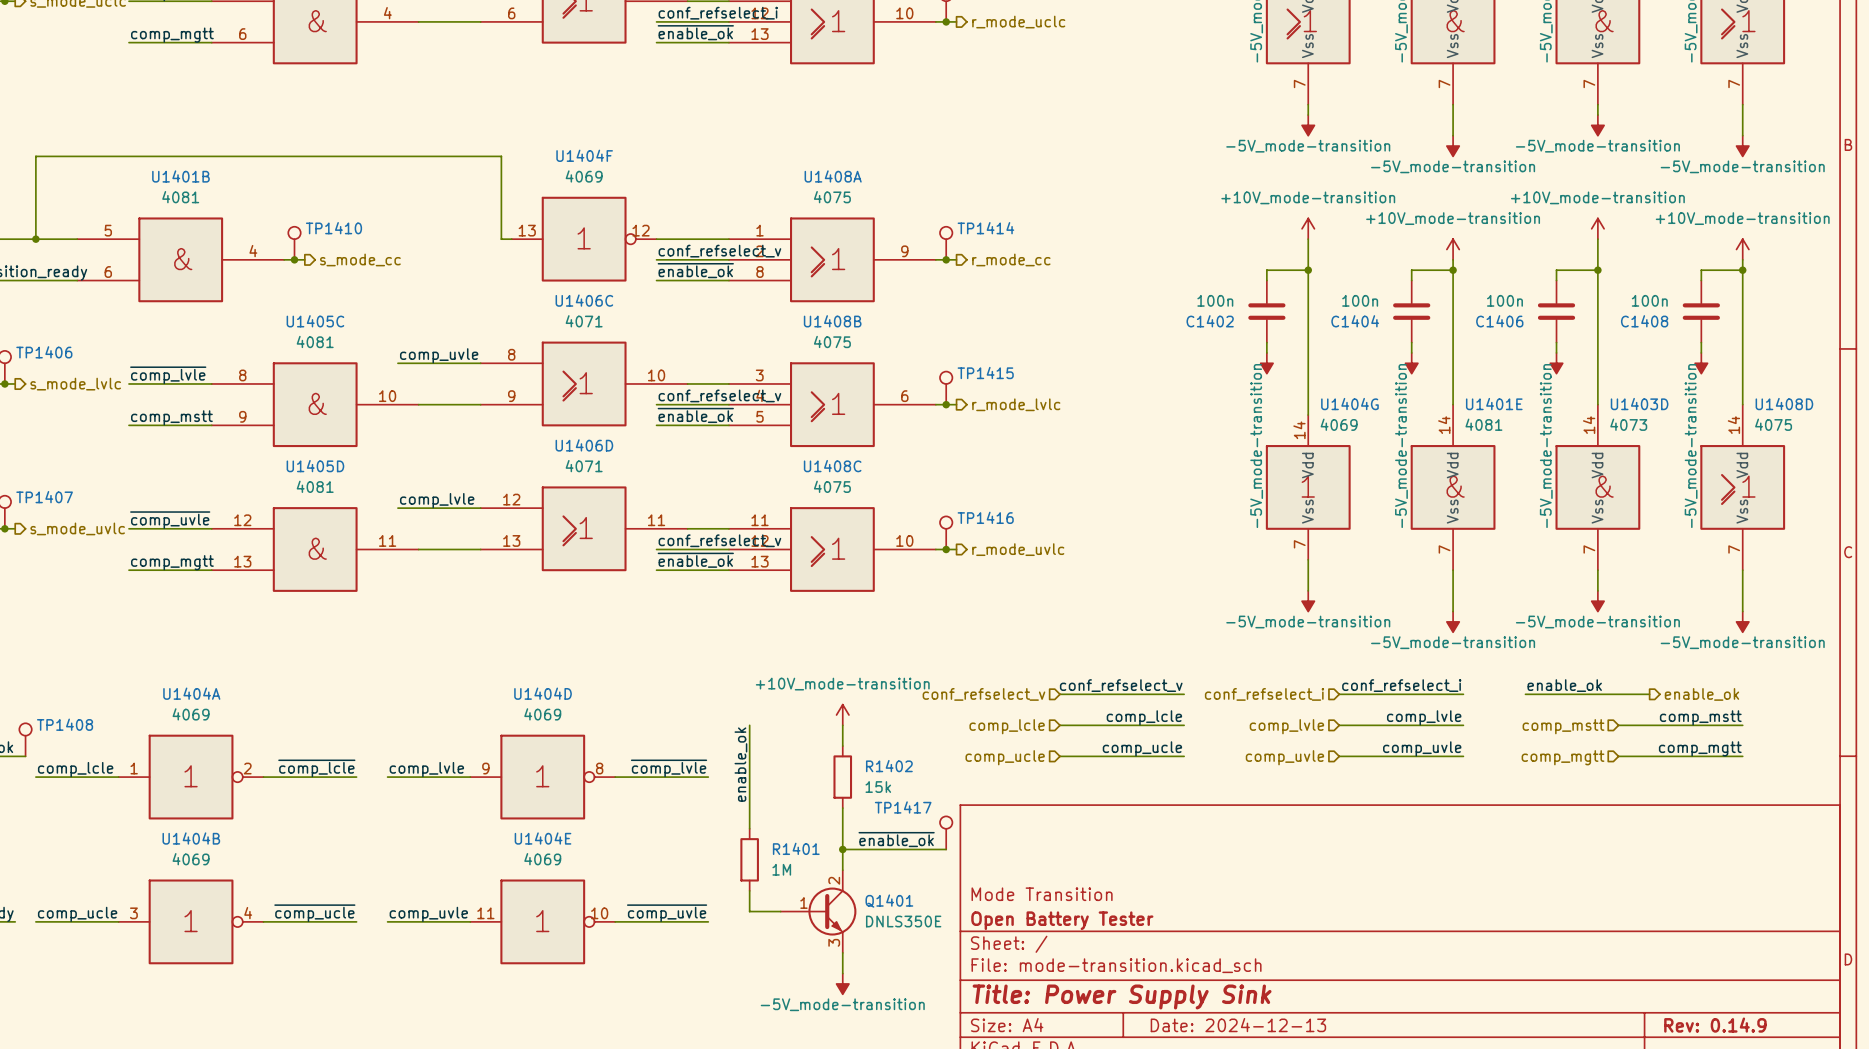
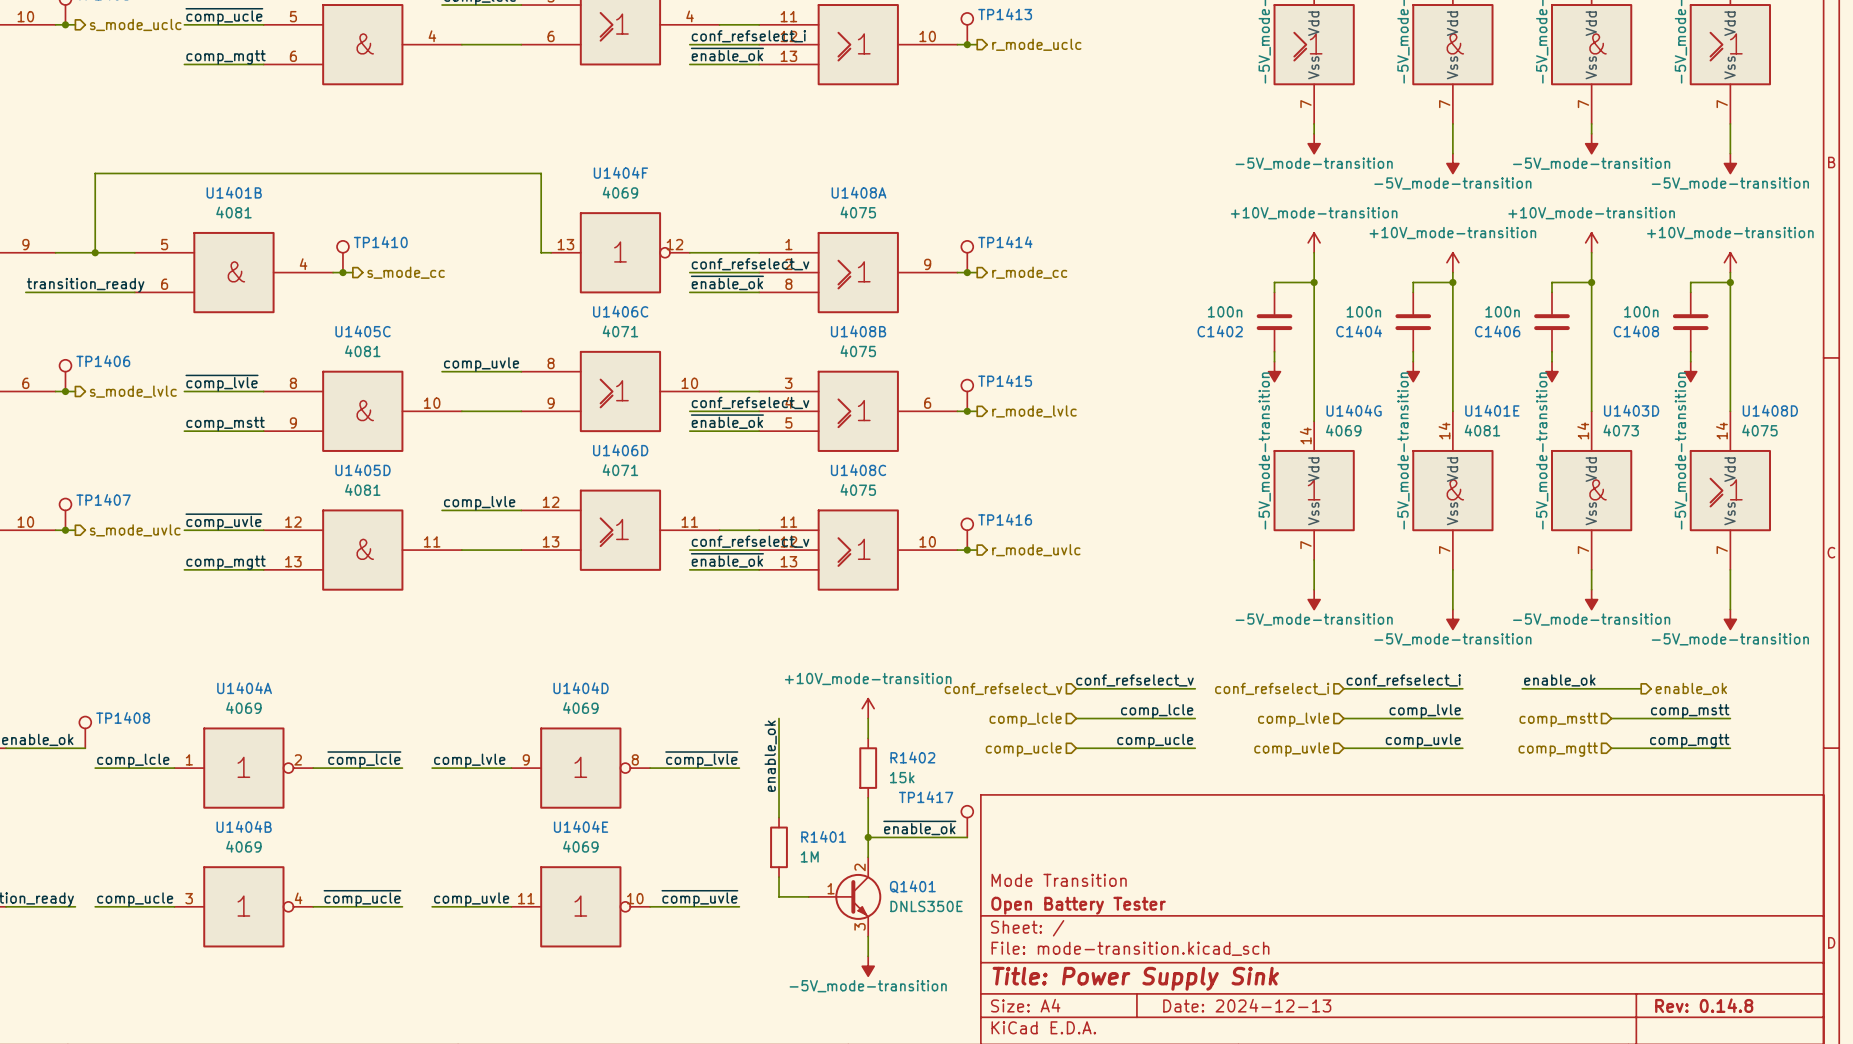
title block: Rev: 0.14.9 (1715, 1025) -> Rev: 0.14.8 (1704, 1005)

